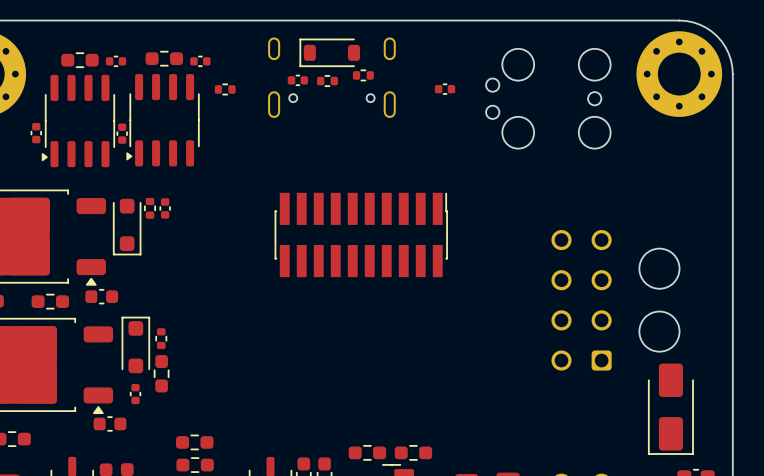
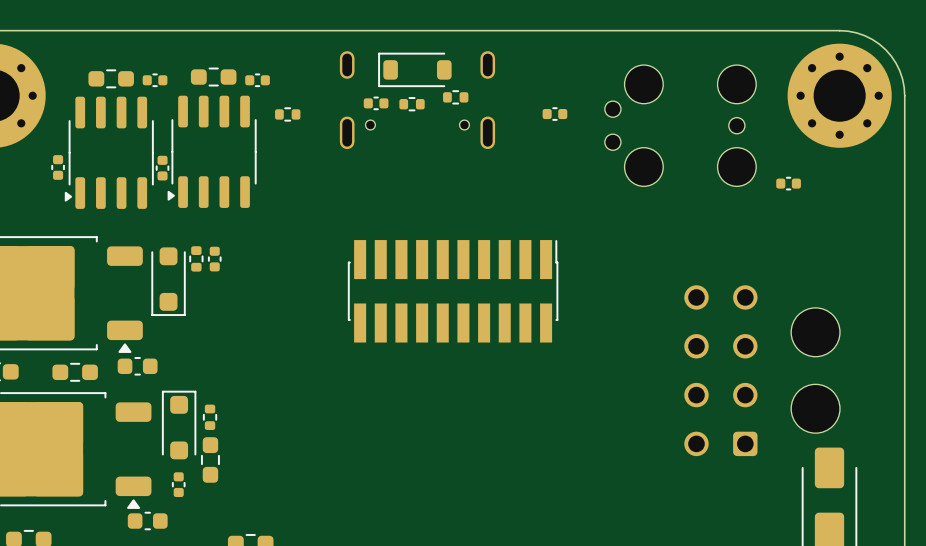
part: none -> (788, 183)

